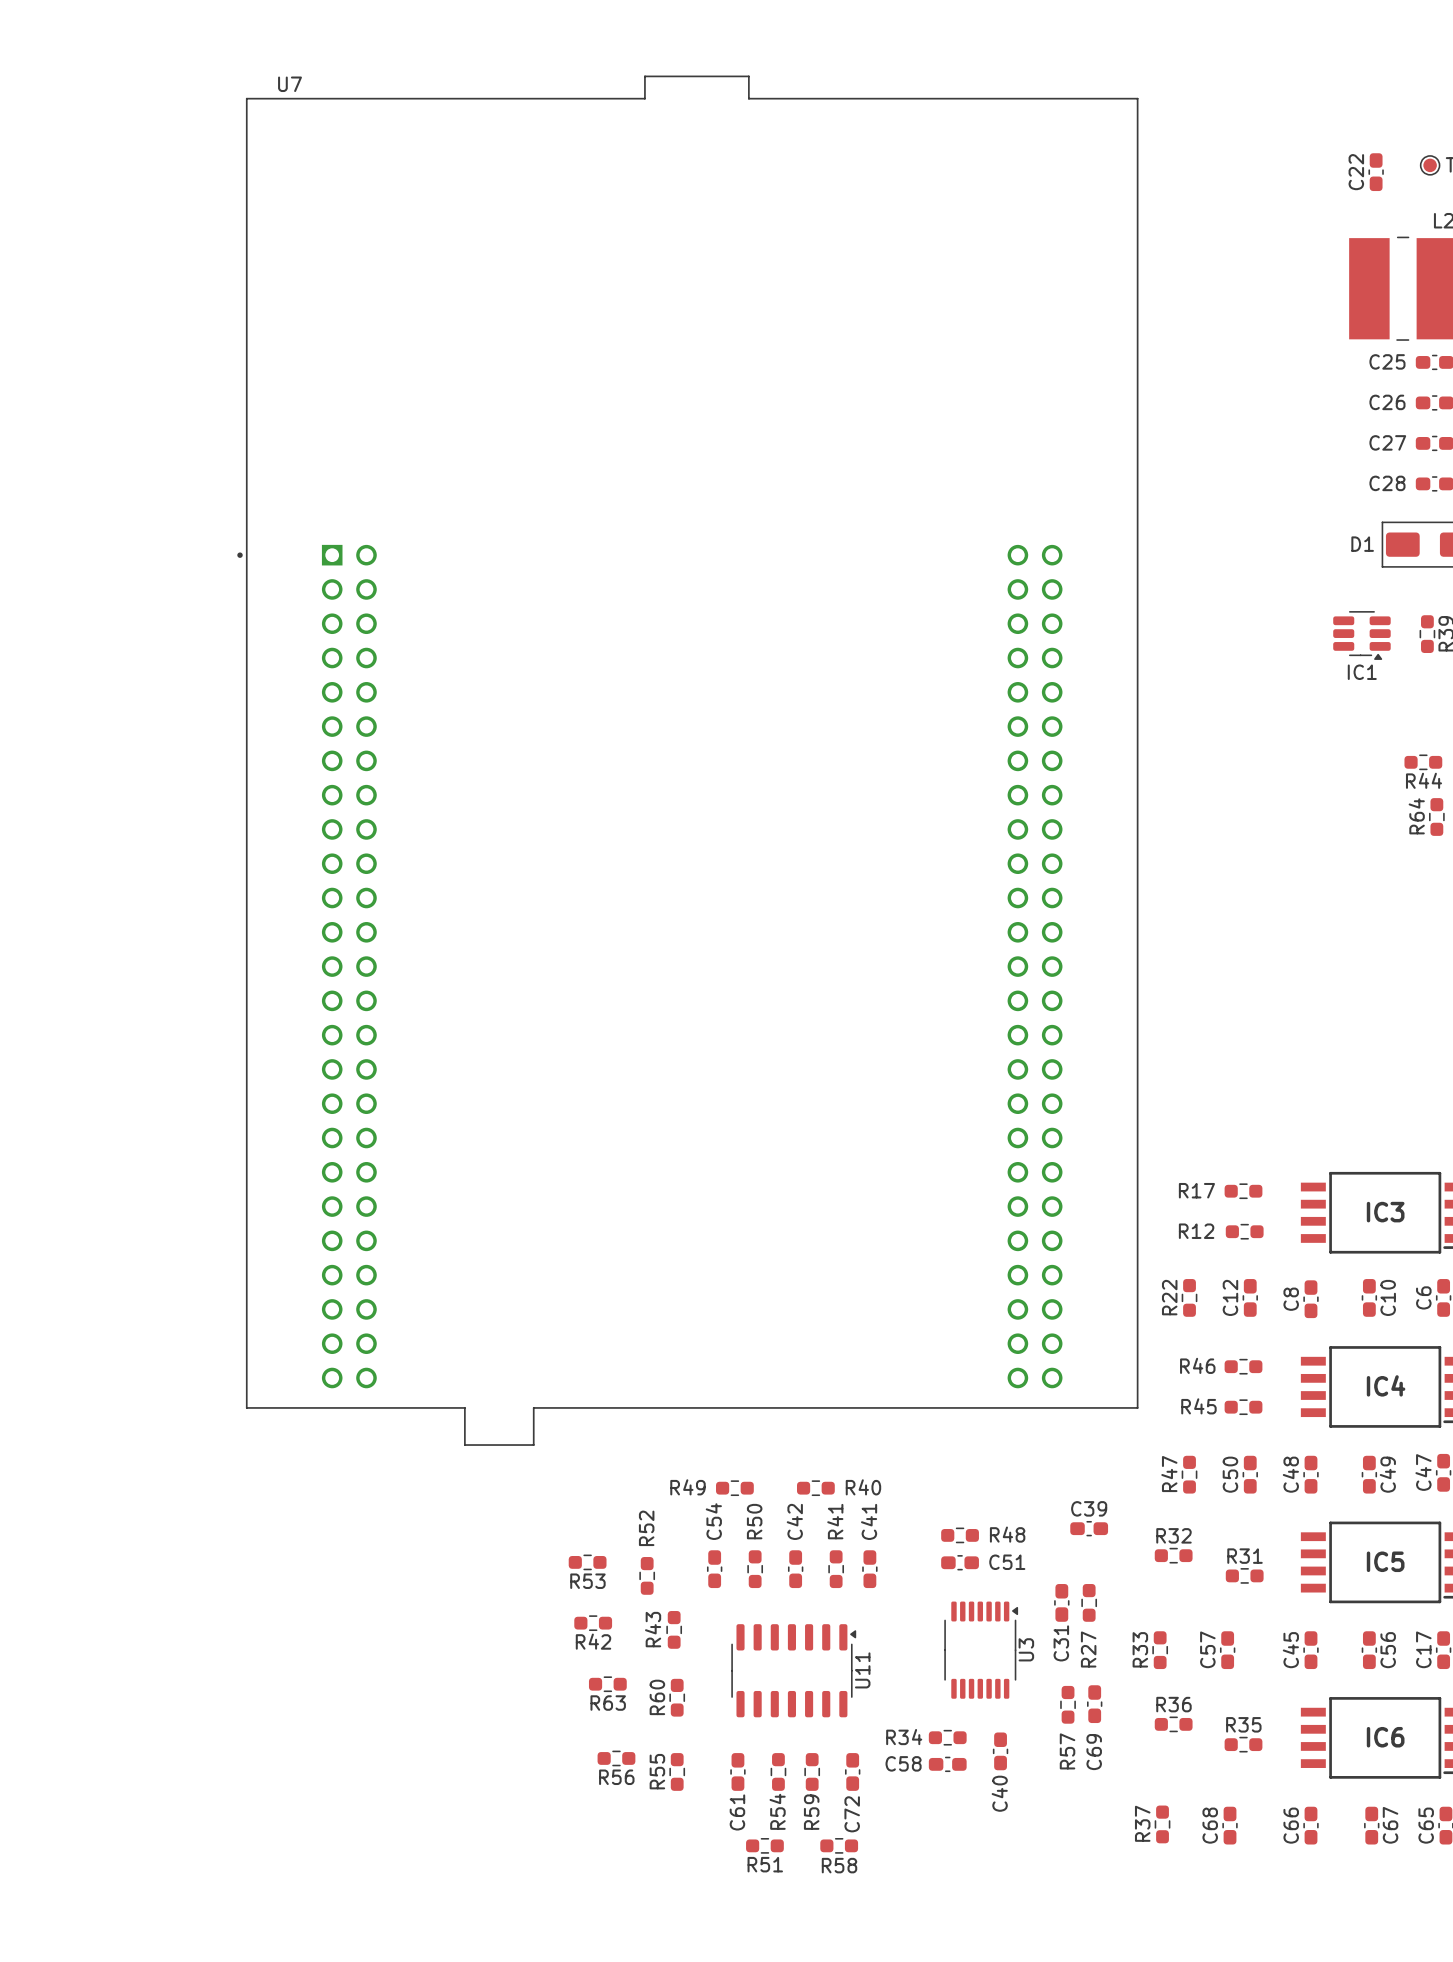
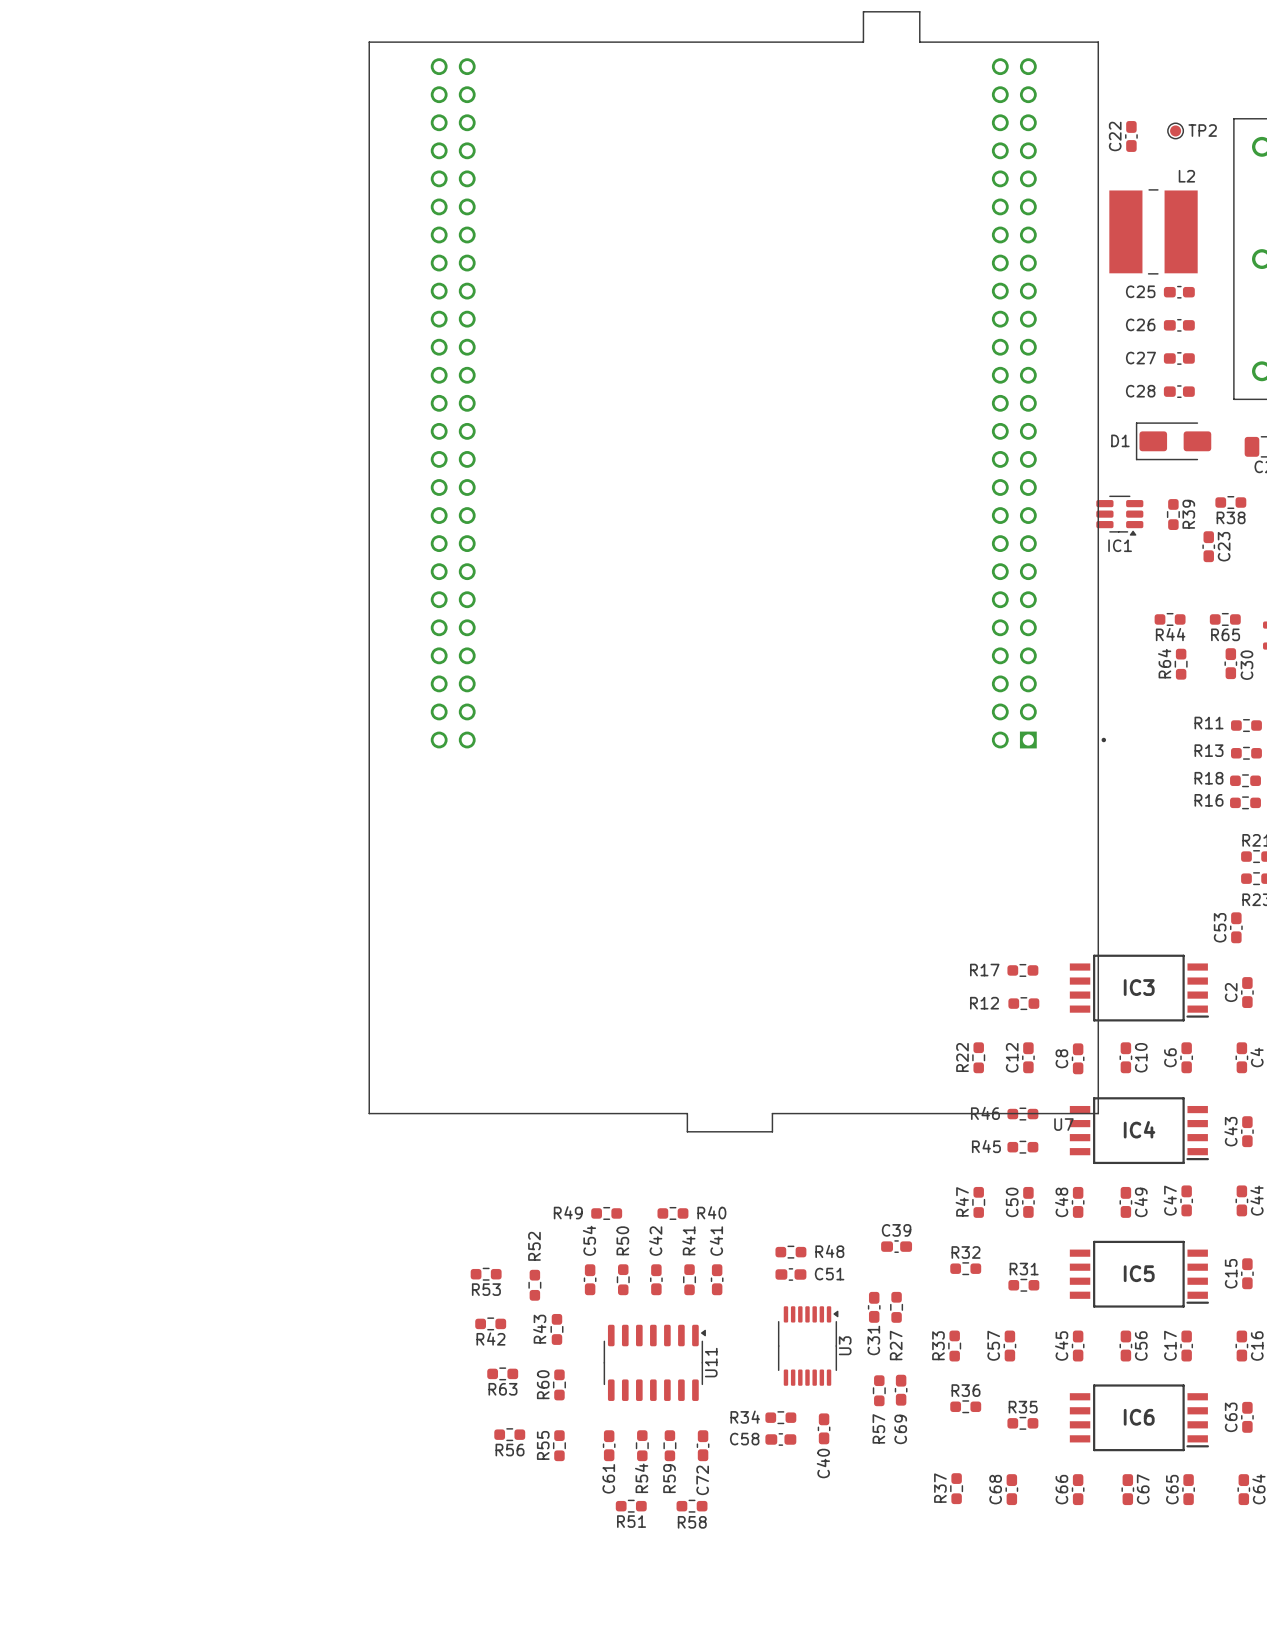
U7 rotation: 0° (687, 760) -> 180° (737, 571)

